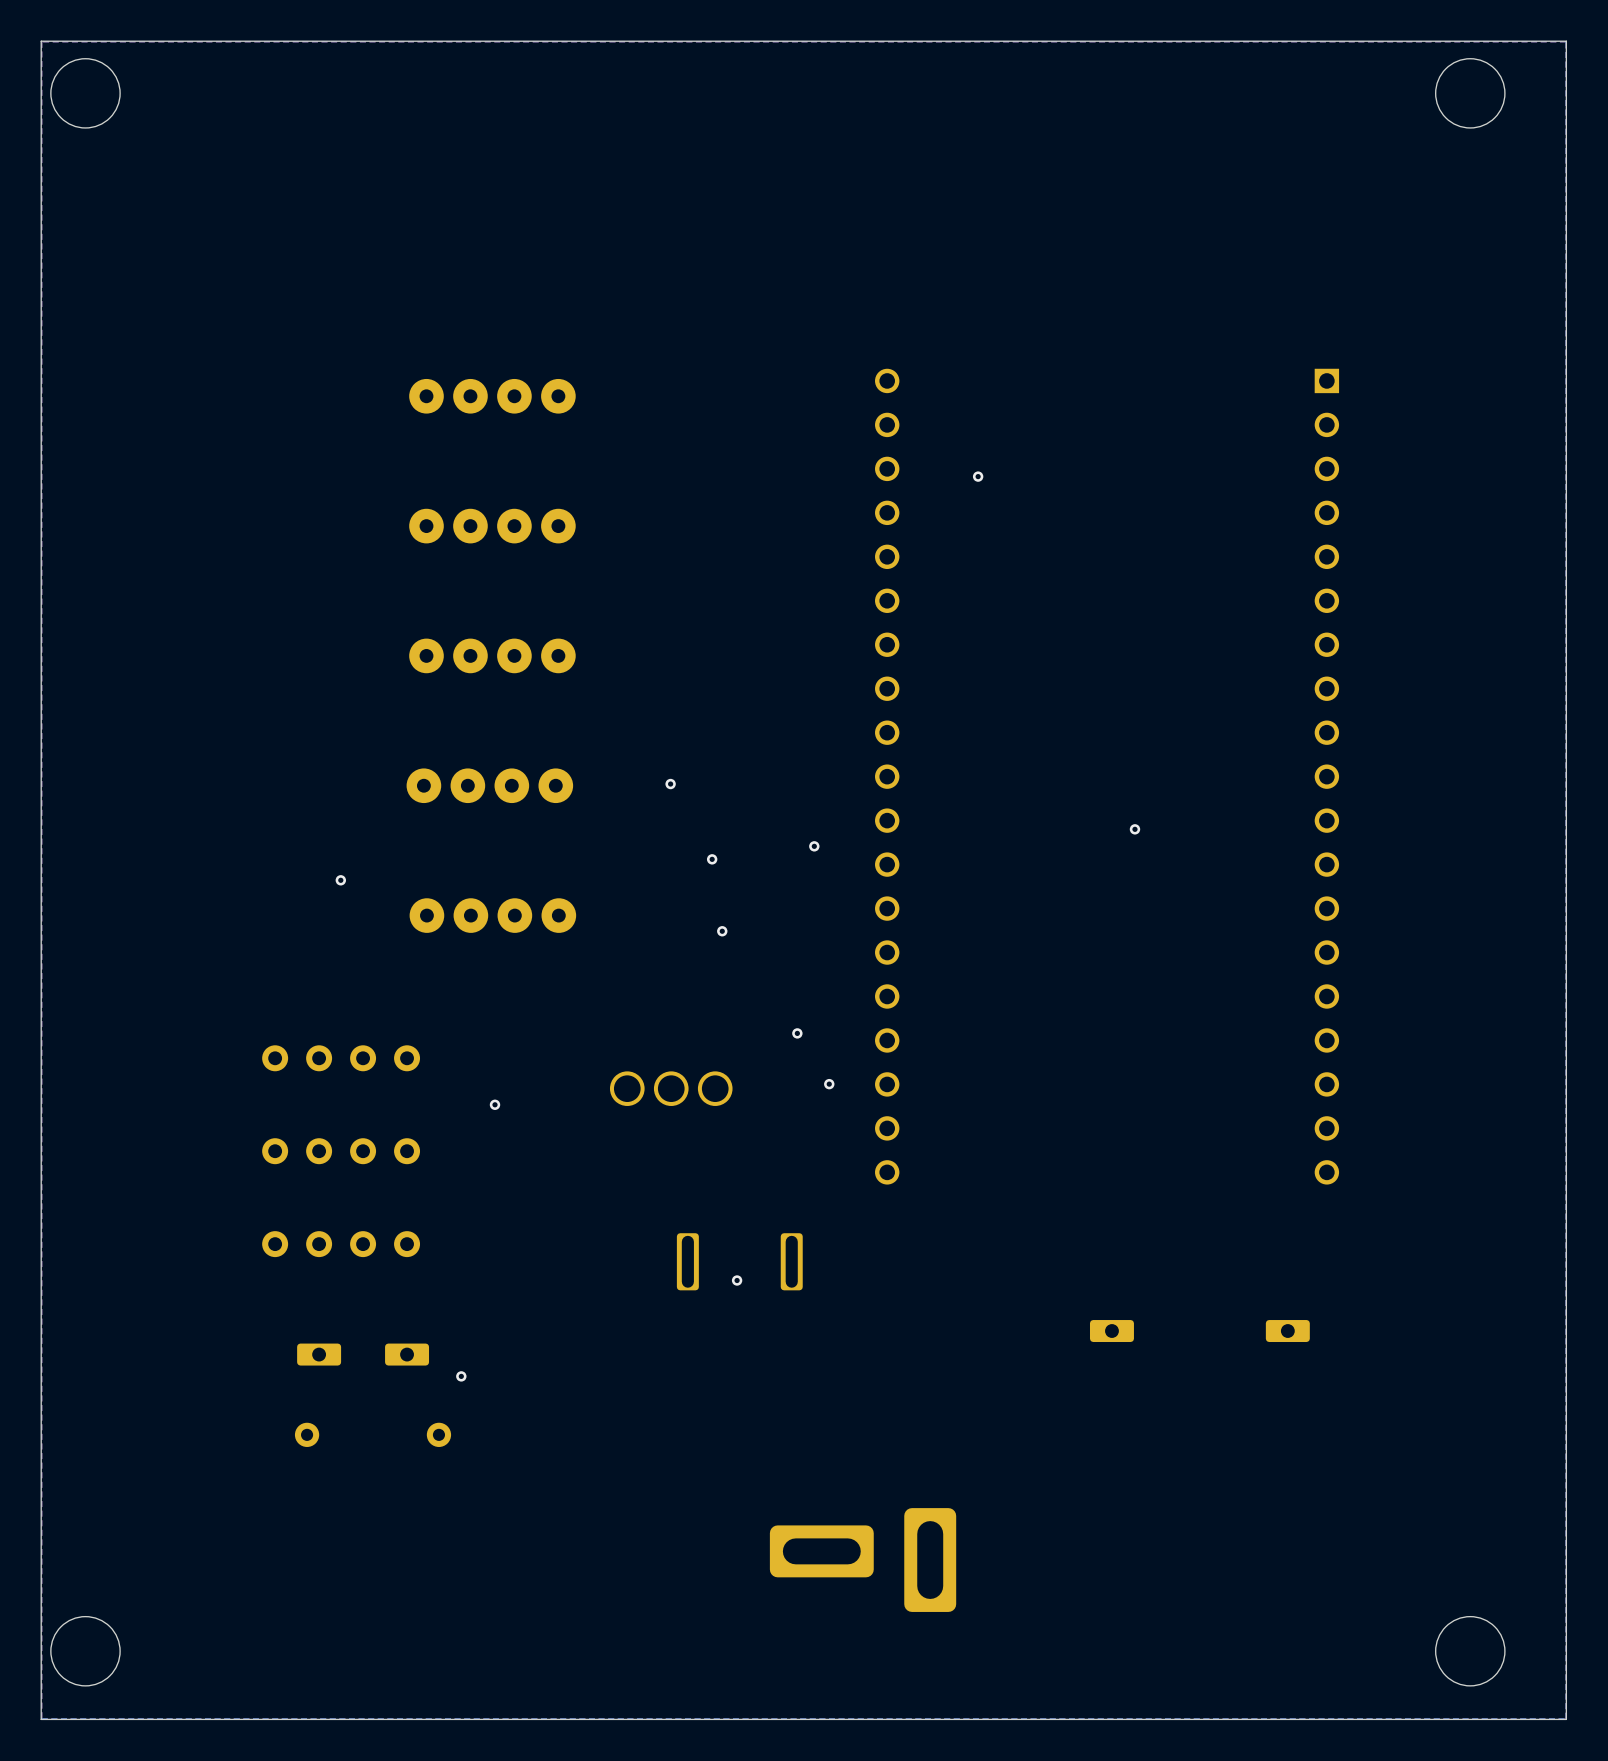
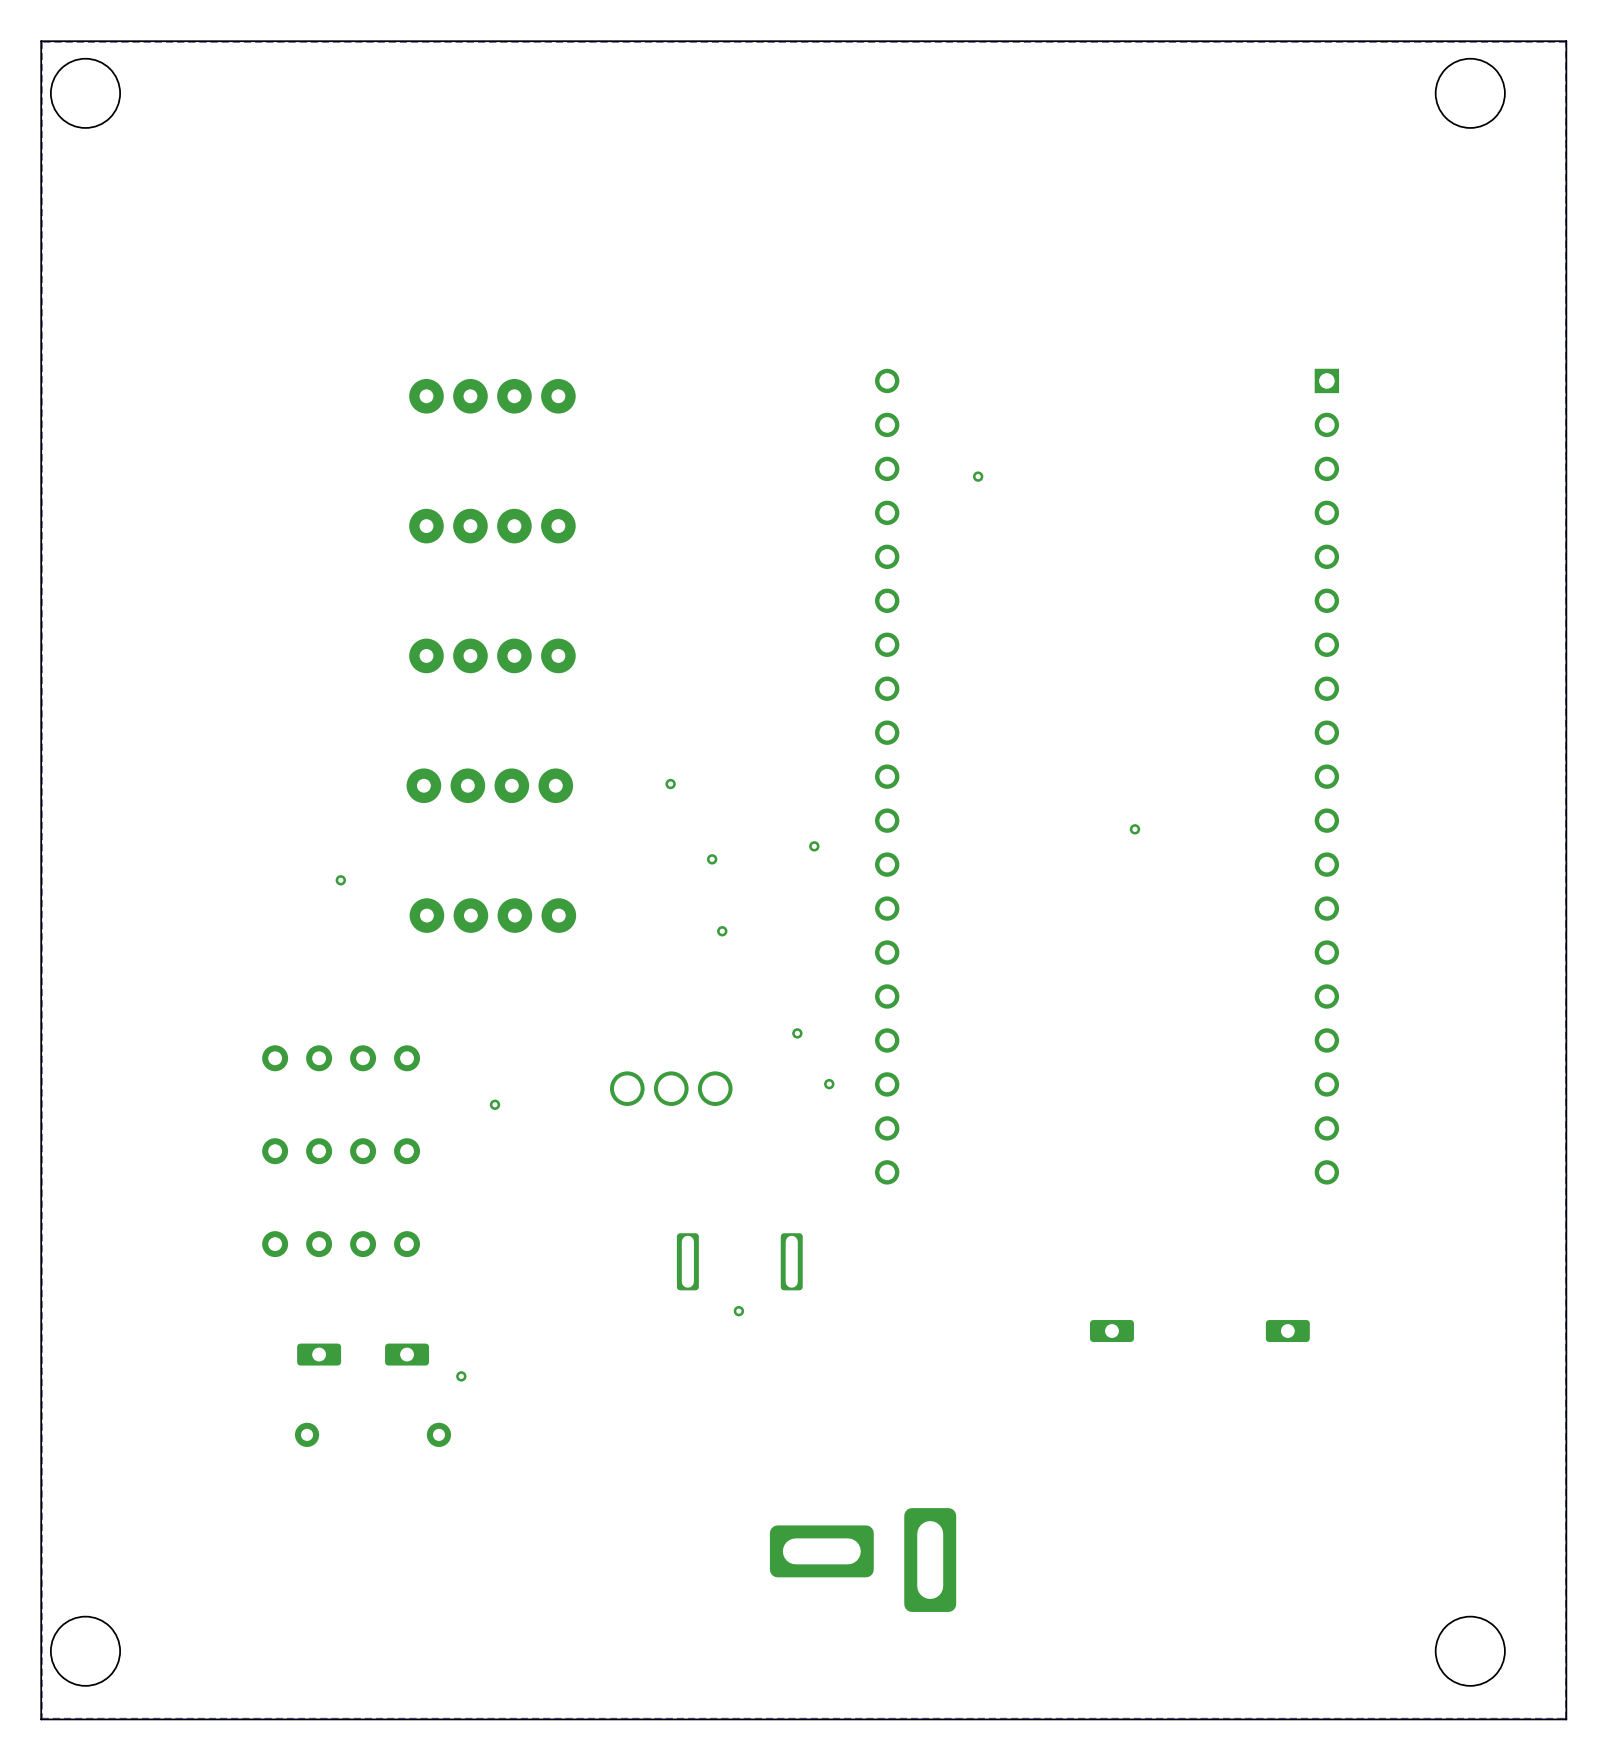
via position: (737, 1280) -> (738, 1311)

